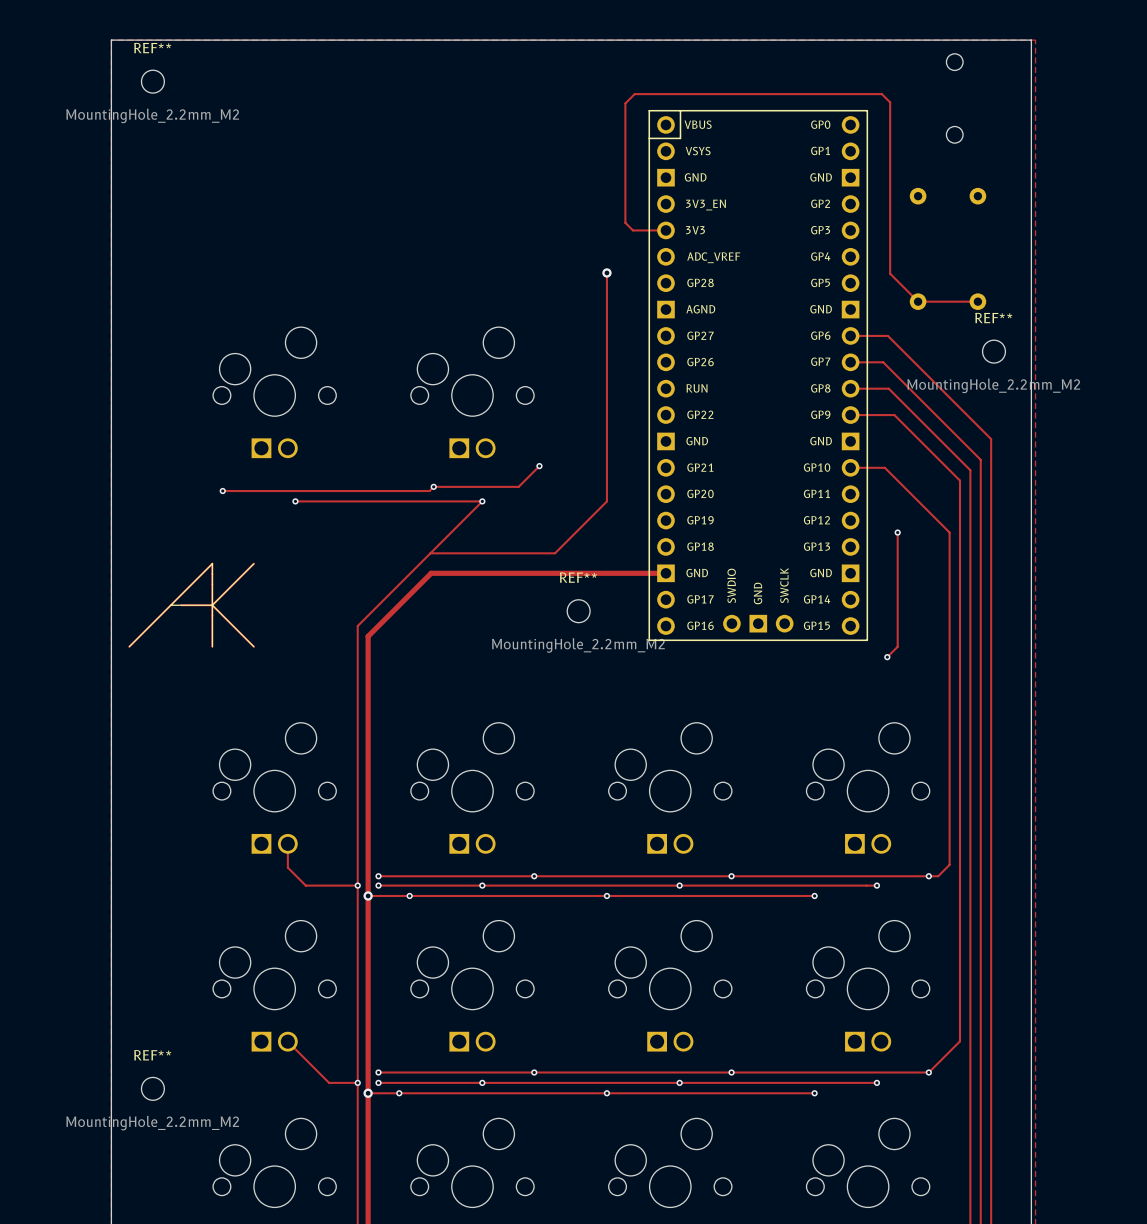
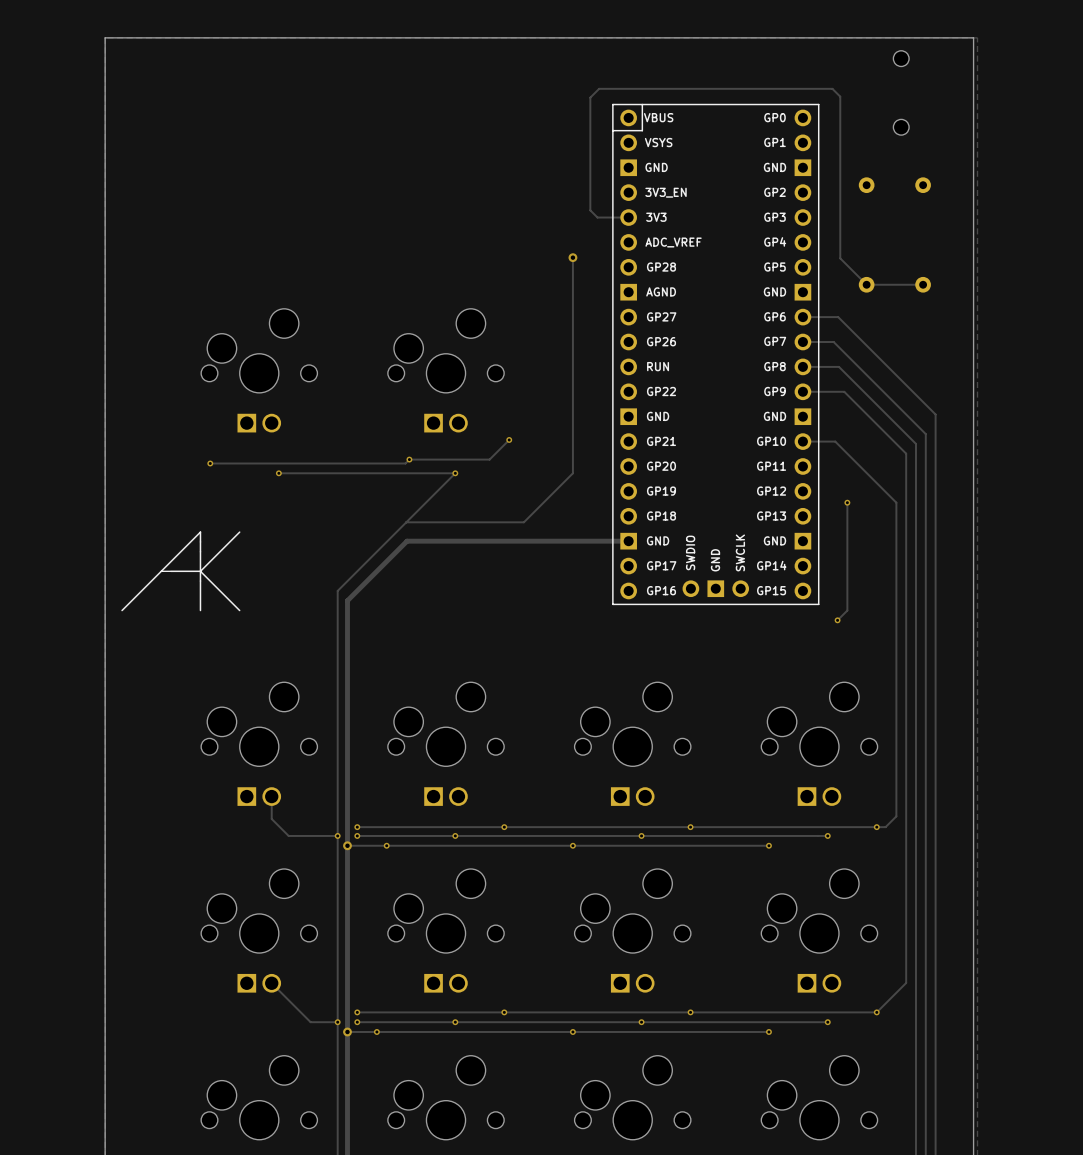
REF**: MountingHole_2.2mm_M2 (152, 81) -> none
REF**: MountingHole_2.2mm_M2 (994, 351) -> none
REF**: MountingHole_2.2mm_M2 (578, 611) -> none
REF**: MountingHole_2.2mm_M2 (152, 1088) -> none

